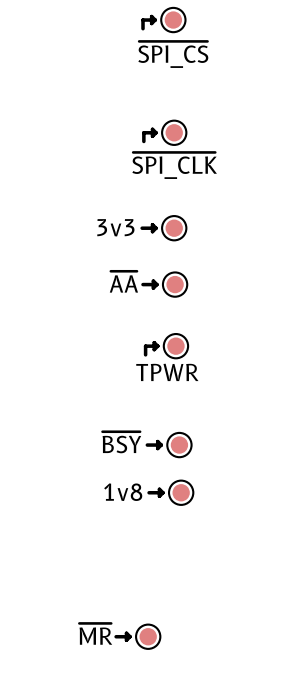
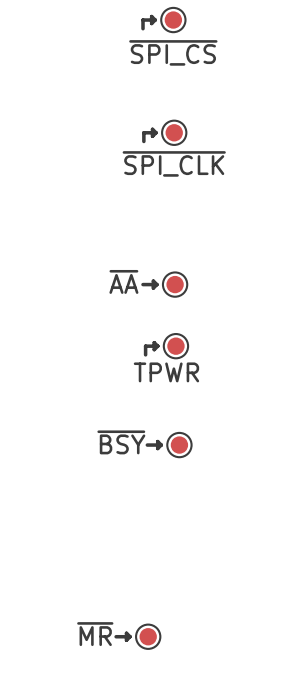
line: (142, 228) (156, 228) -> none
line: (156, 228) (152, 231) (152, 224) (156, 228) -> none
part: 3v3 (174, 228) -> none
line: (149, 492) (162, 492) -> none
line: (162, 492) (159, 489) (159, 496) (162, 492) -> none
part: 1v8 (181, 492) -> none

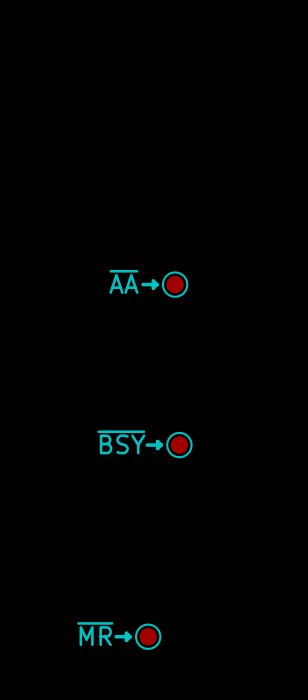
line: (155, 20) (143, 20) (143, 28) -> none
line: (155, 20) (151, 23) (151, 16) (155, 20) -> none
part: ~{SPI_CS} (173, 20) -> none
line: (156, 132) (152, 136) (152, 129) (156, 132) -> none
line: (156, 132) (143, 132) (143, 141) -> none
part: ~{SPI_CLK} (174, 132) -> none
line: (157, 346) (145, 346) (145, 354) -> none
line: (157, 346) (154, 342) (154, 349) (157, 346) -> none
part: TPWR (175, 346) -> none

